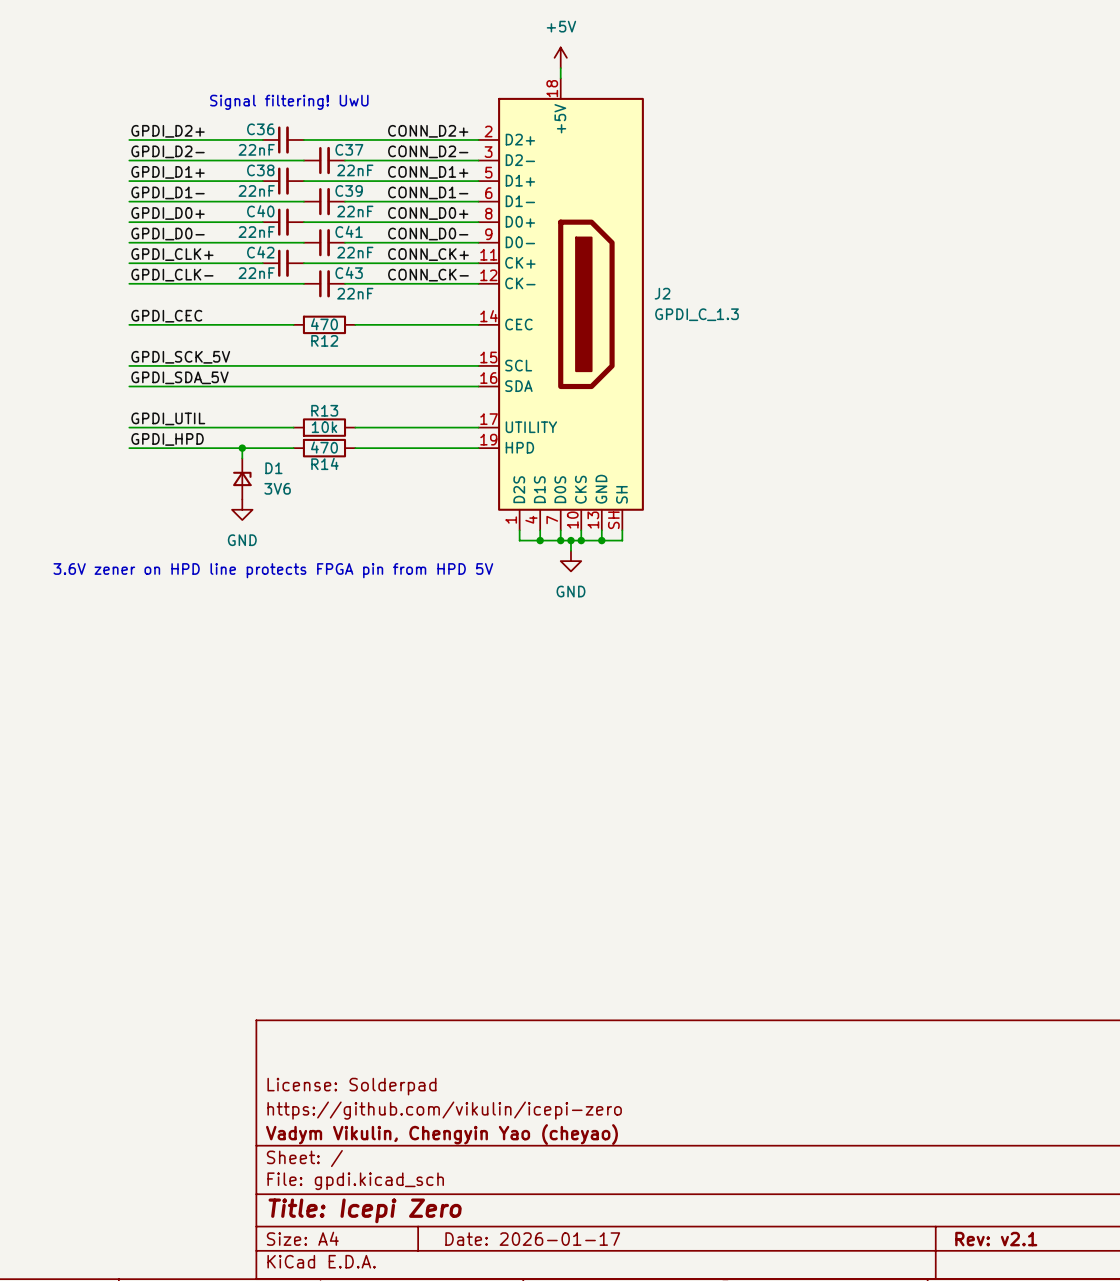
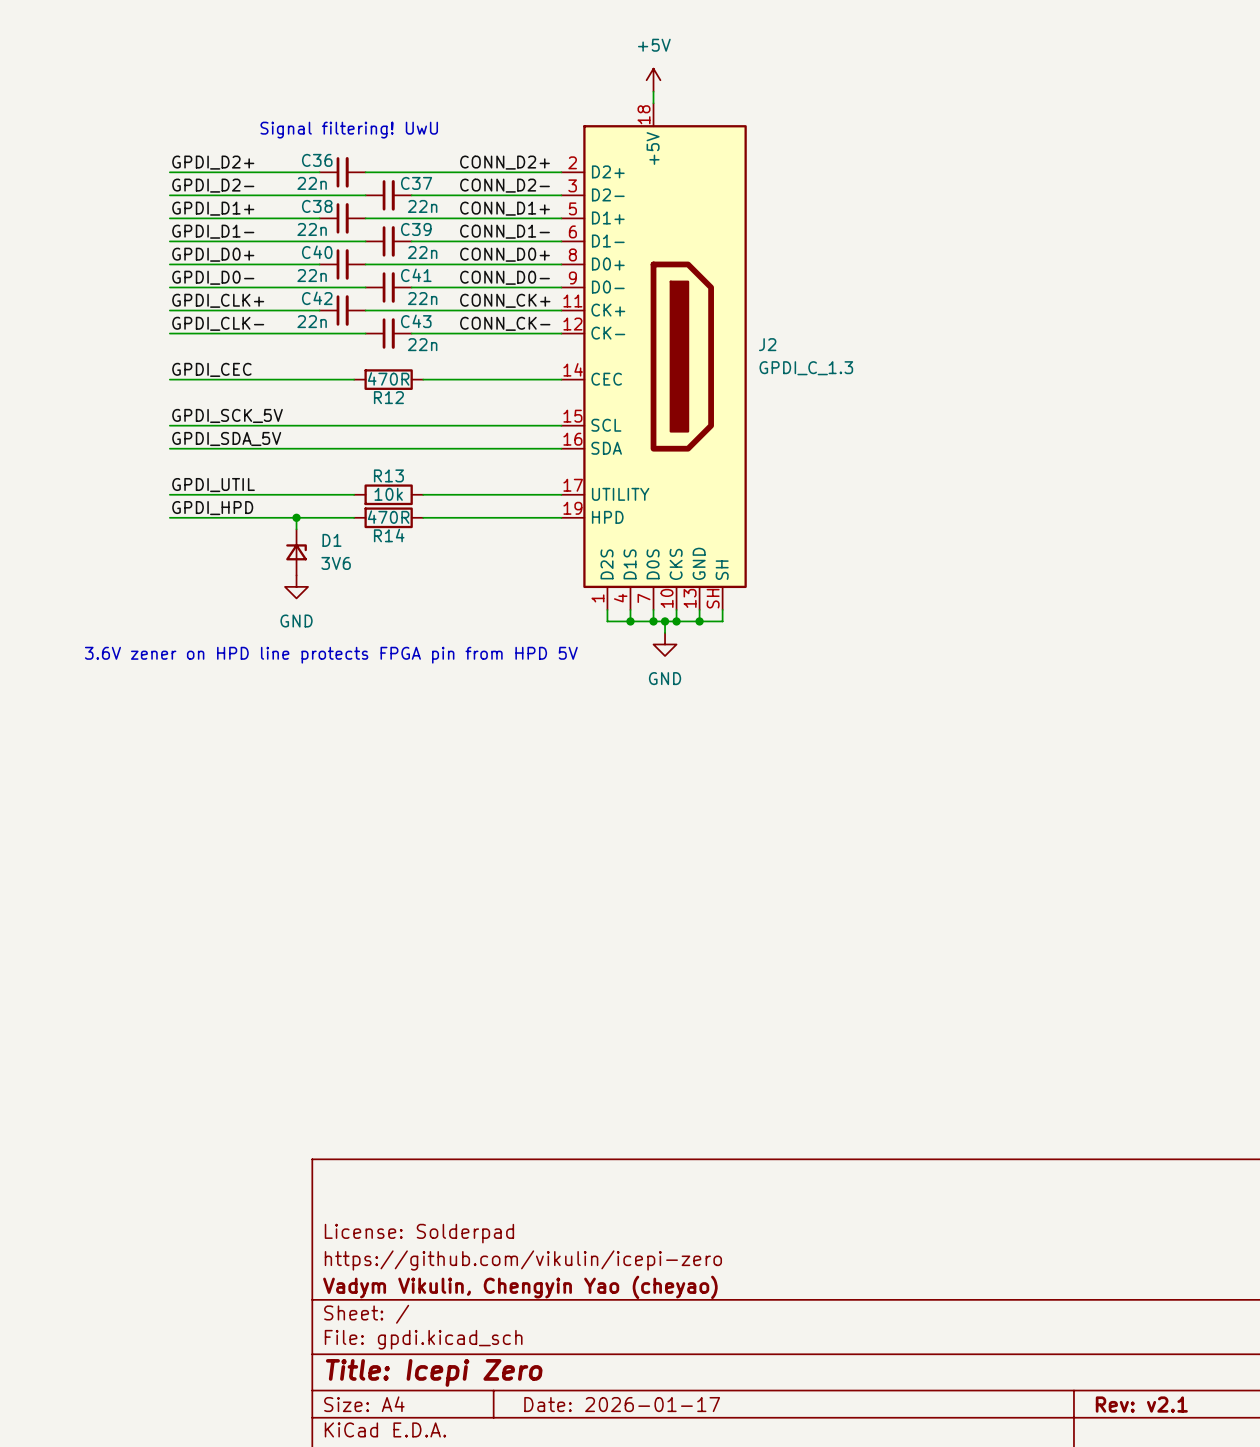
C36 value: 22nF (256, 149) -> 22n (312, 183)
C37 value: 22nF (355, 170) -> 22n (422, 206)
C38 value: 22nF (256, 190) -> 22n (312, 229)
C39 value: 22nF (355, 211) -> 22n (422, 252)
C40 value: 22nF (256, 232) -> 22n (312, 275)
C41 value: 22nF (355, 252) -> 22n (422, 298)
C42 value: 22nF (256, 273) -> 22n (312, 321)
C43 value: 22nF (355, 293) -> 22n (422, 344)
R12 value: 470 (324, 324) -> 470R (388, 378)
R14 value: 470 (324, 447) -> 470R (388, 517)

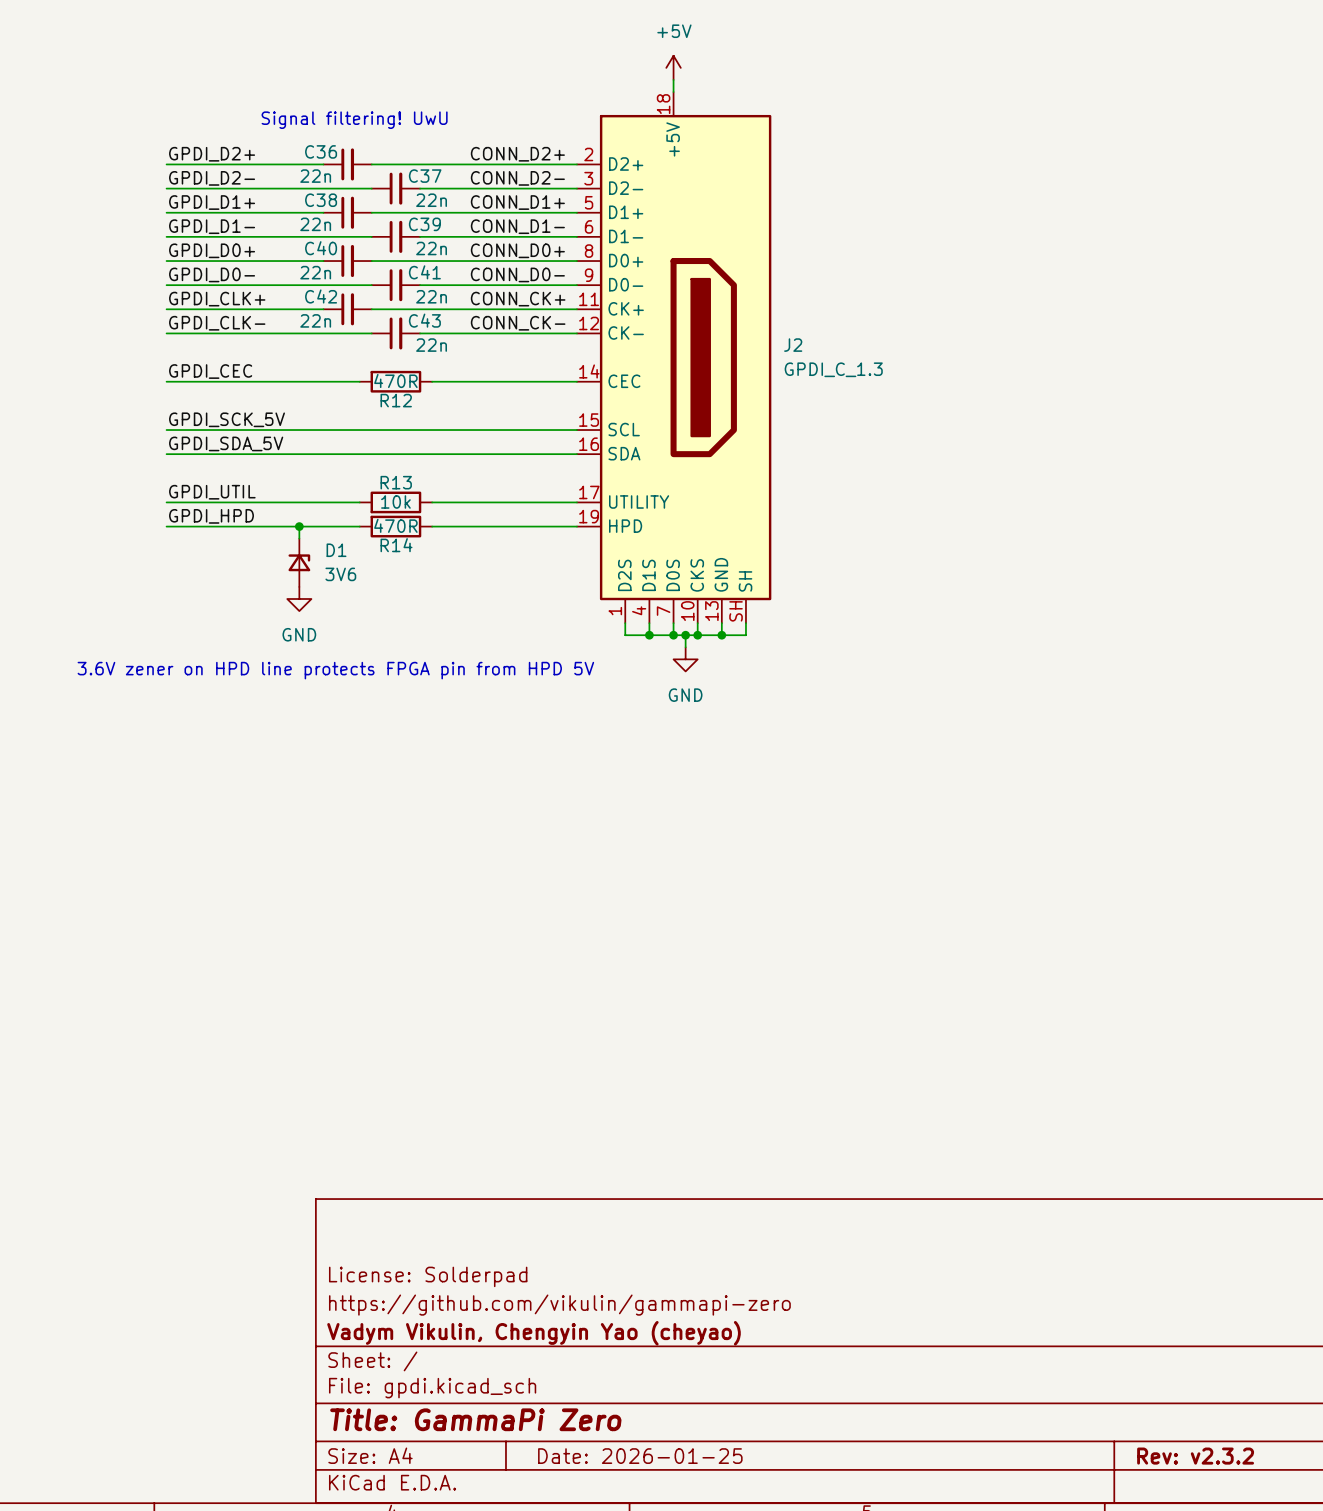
title block: https://github.com/vikulin/icepi-zero (523, 1260) -> https://github.com/vikulin/gammapi-zero (559, 1305)
title block: Title: Icepi Zero (434, 1372) -> Title: GammaPi Zero (475, 1419)
title block: Date: 2026-01-17 (622, 1404) -> Date: 2026-01-25 (640, 1456)
title block: Rev: v2.1 (1141, 1404) -> Rev: v2.3.2 (1195, 1456)

